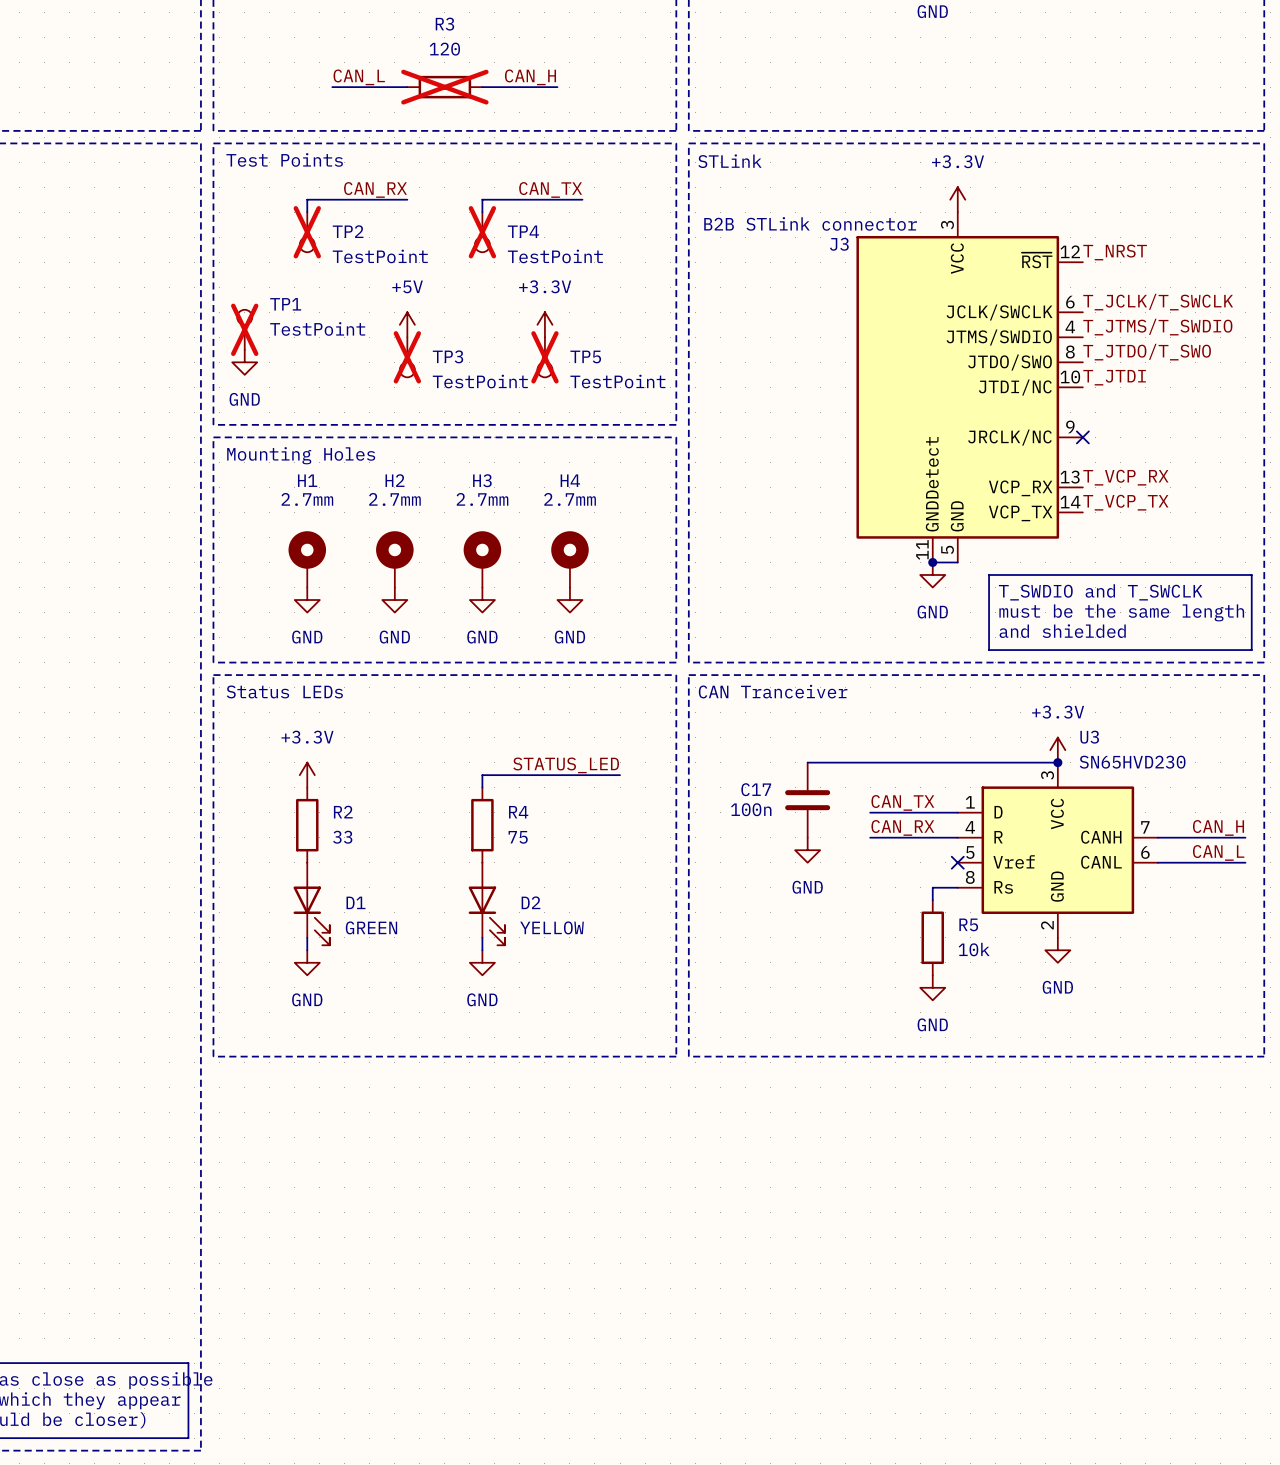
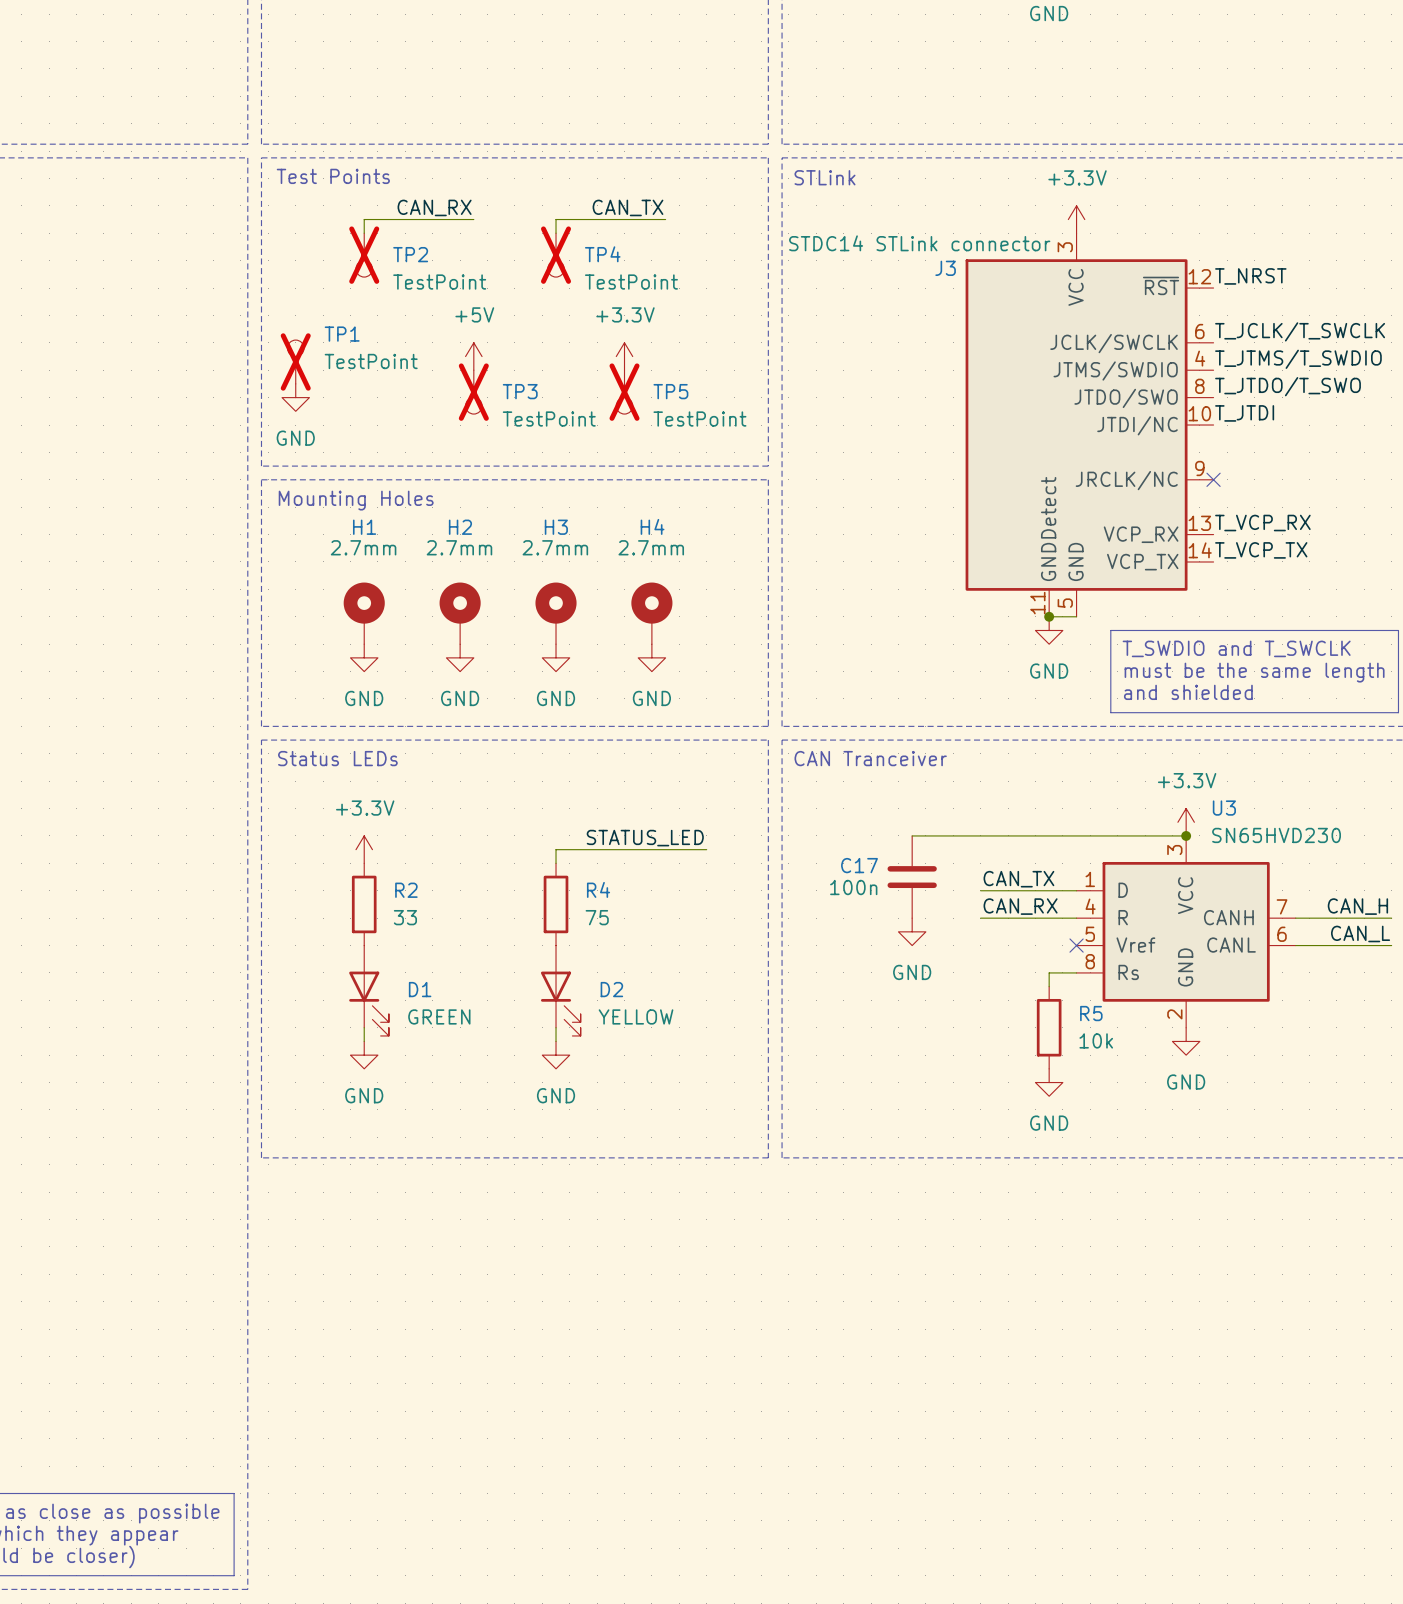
label: CAN_L (359, 77) -> none
label: CAN_H (530, 77) -> none
wire: (332, 87) (407, 87) -> none
R3: 120 (444, 87) -> none
wire: (482, 87) (557, 87) -> none
J3 value: B2B STLink connector (810, 223) -> STDC14 STLink connector (919, 243)

